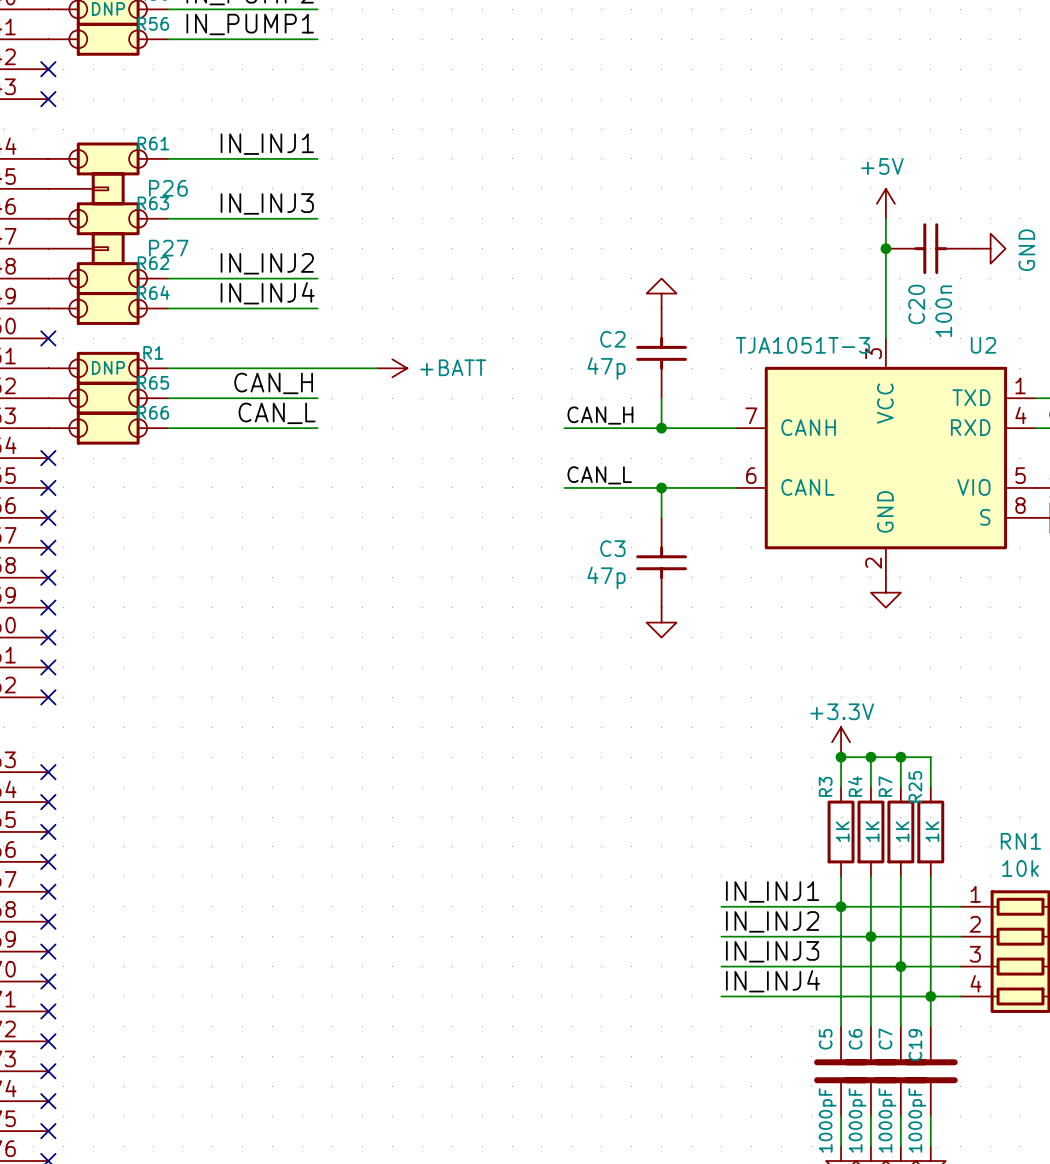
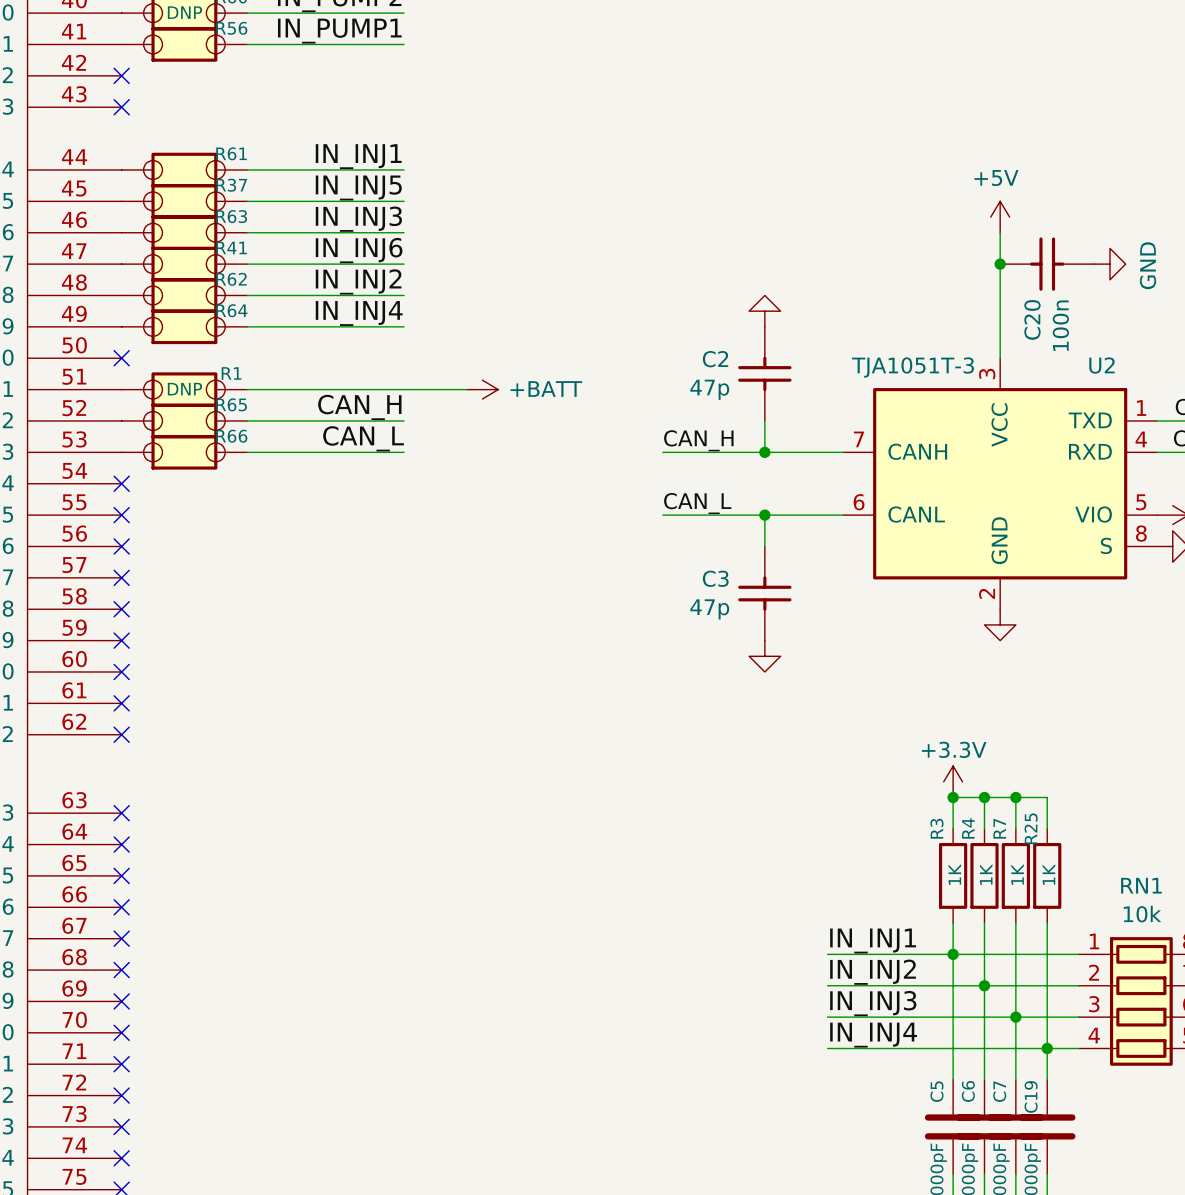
label: none -> IN_INJ5 (358, 187)
P26: (86, 188) -> none
R37: none -> (184, 201)
wire: none -> (247, 201) (404, 201)
label: none -> IN_INJ6 (359, 250)
P27: (86, 248) -> none
R41: none -> (184, 264)
wire: none -> (247, 264) (404, 264)

